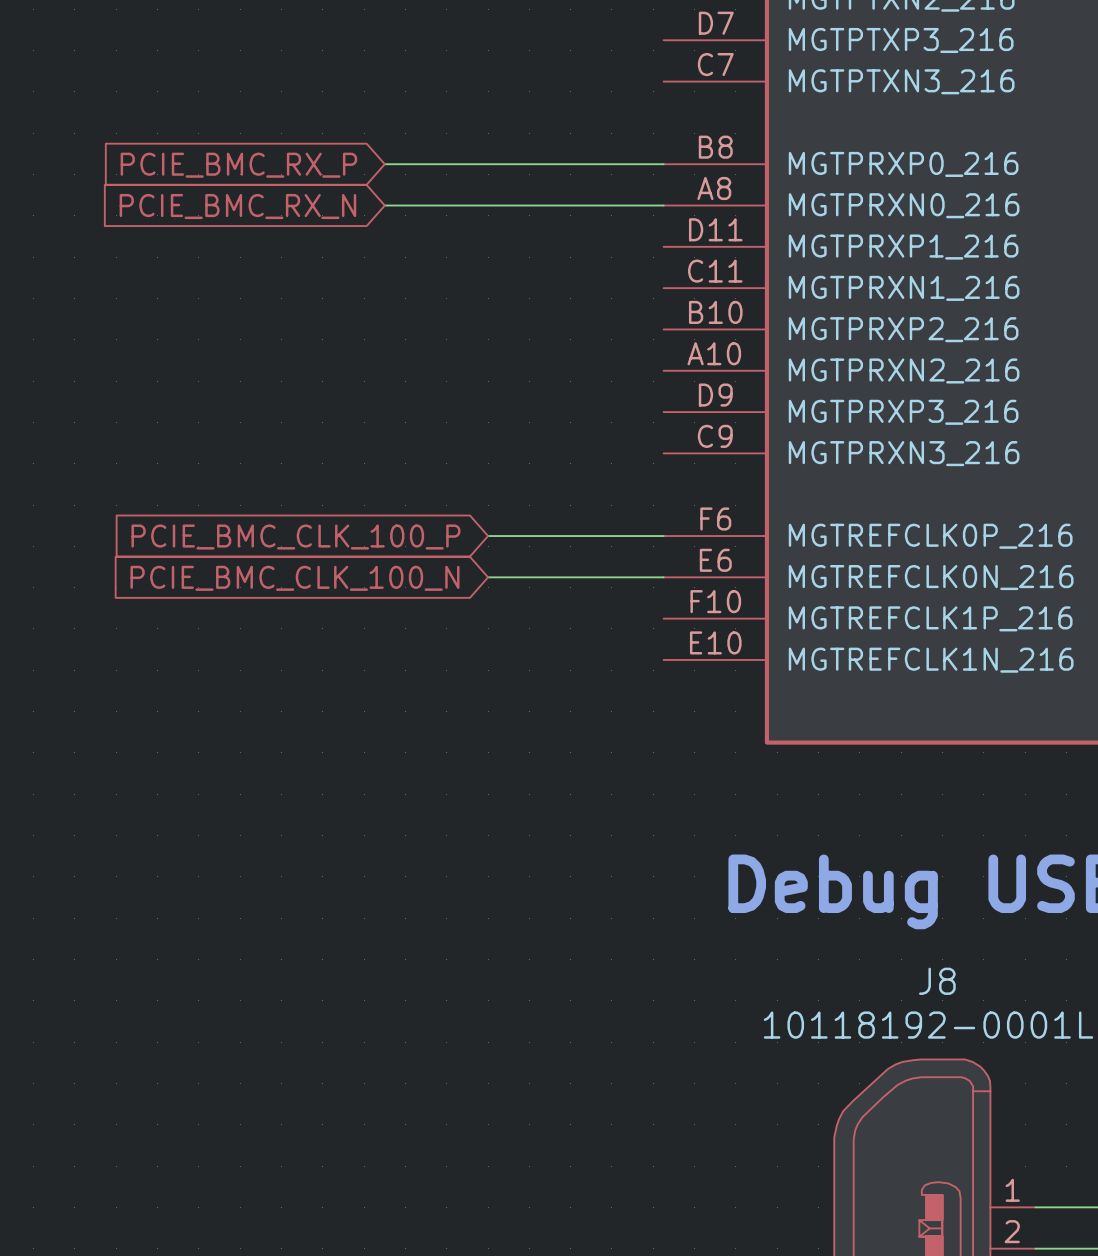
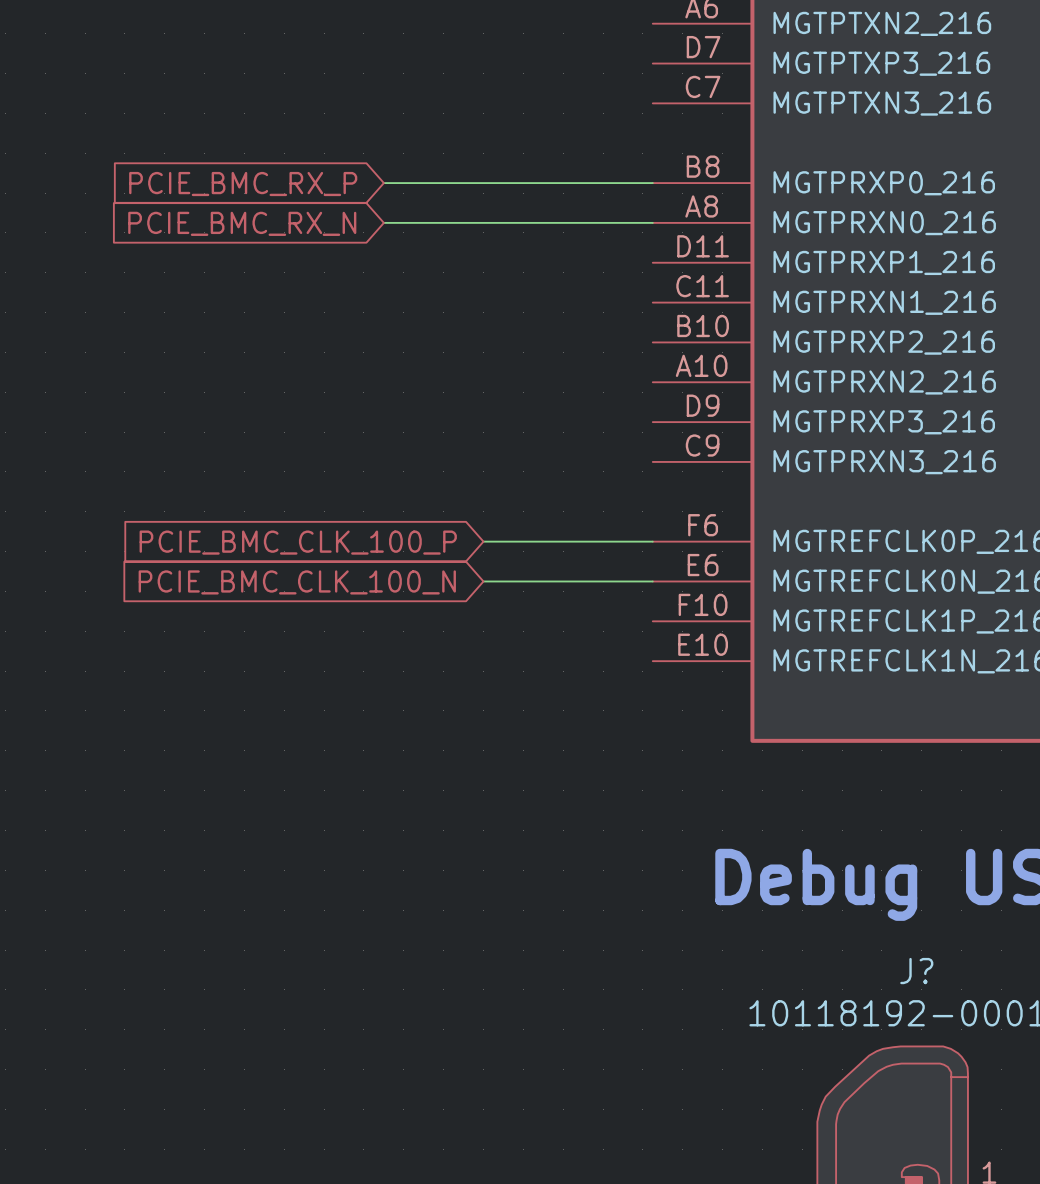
J8 name: J8 (937, 981) -> J? (916, 971)

